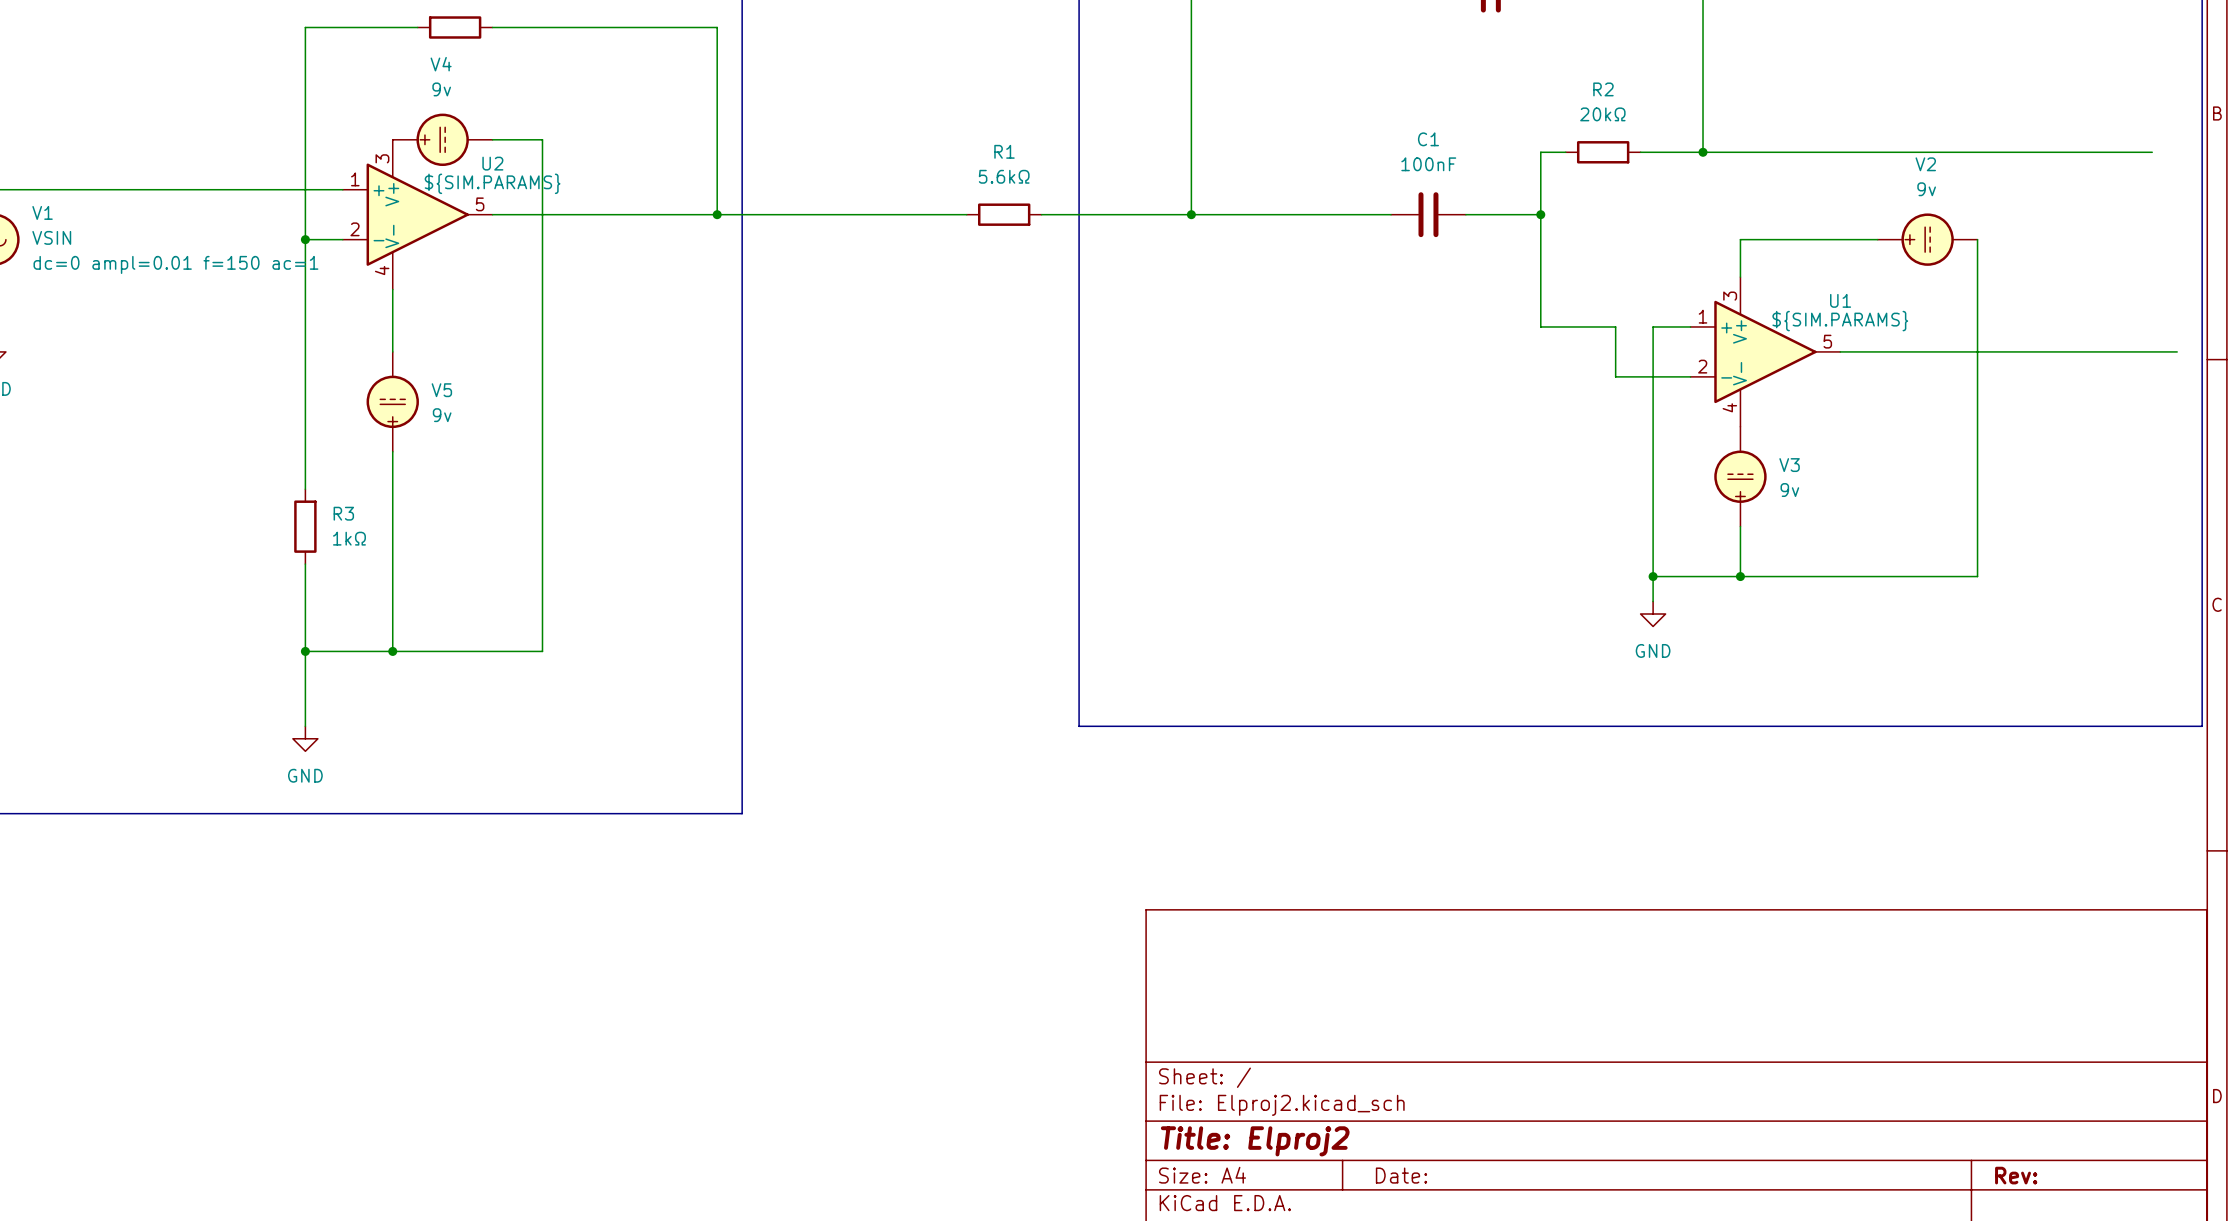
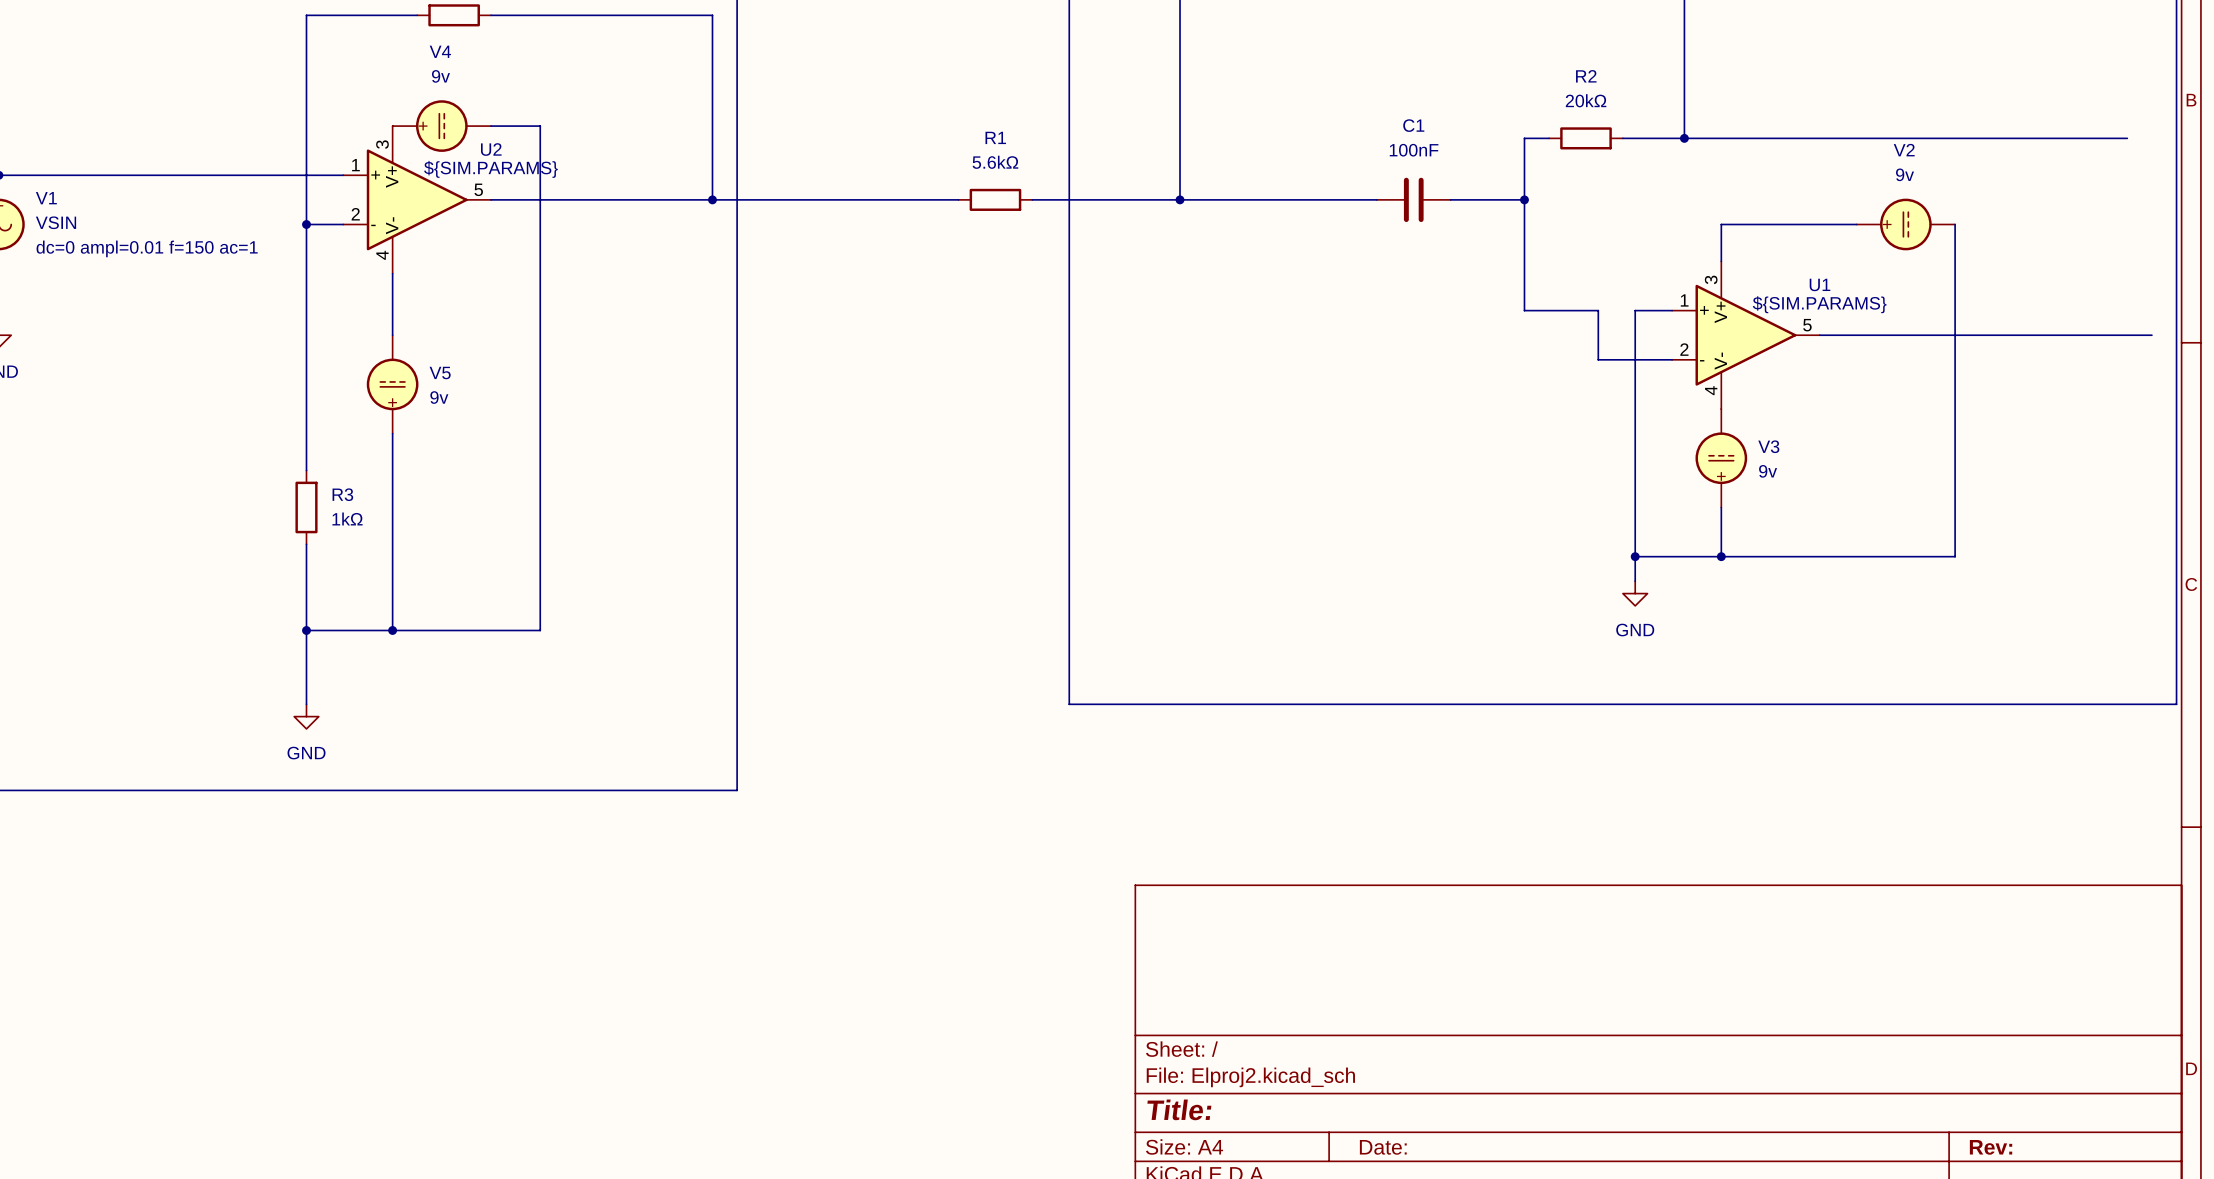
title block: Title: Elproj2 (1255, 1141) -> Title: (1179, 1109)

